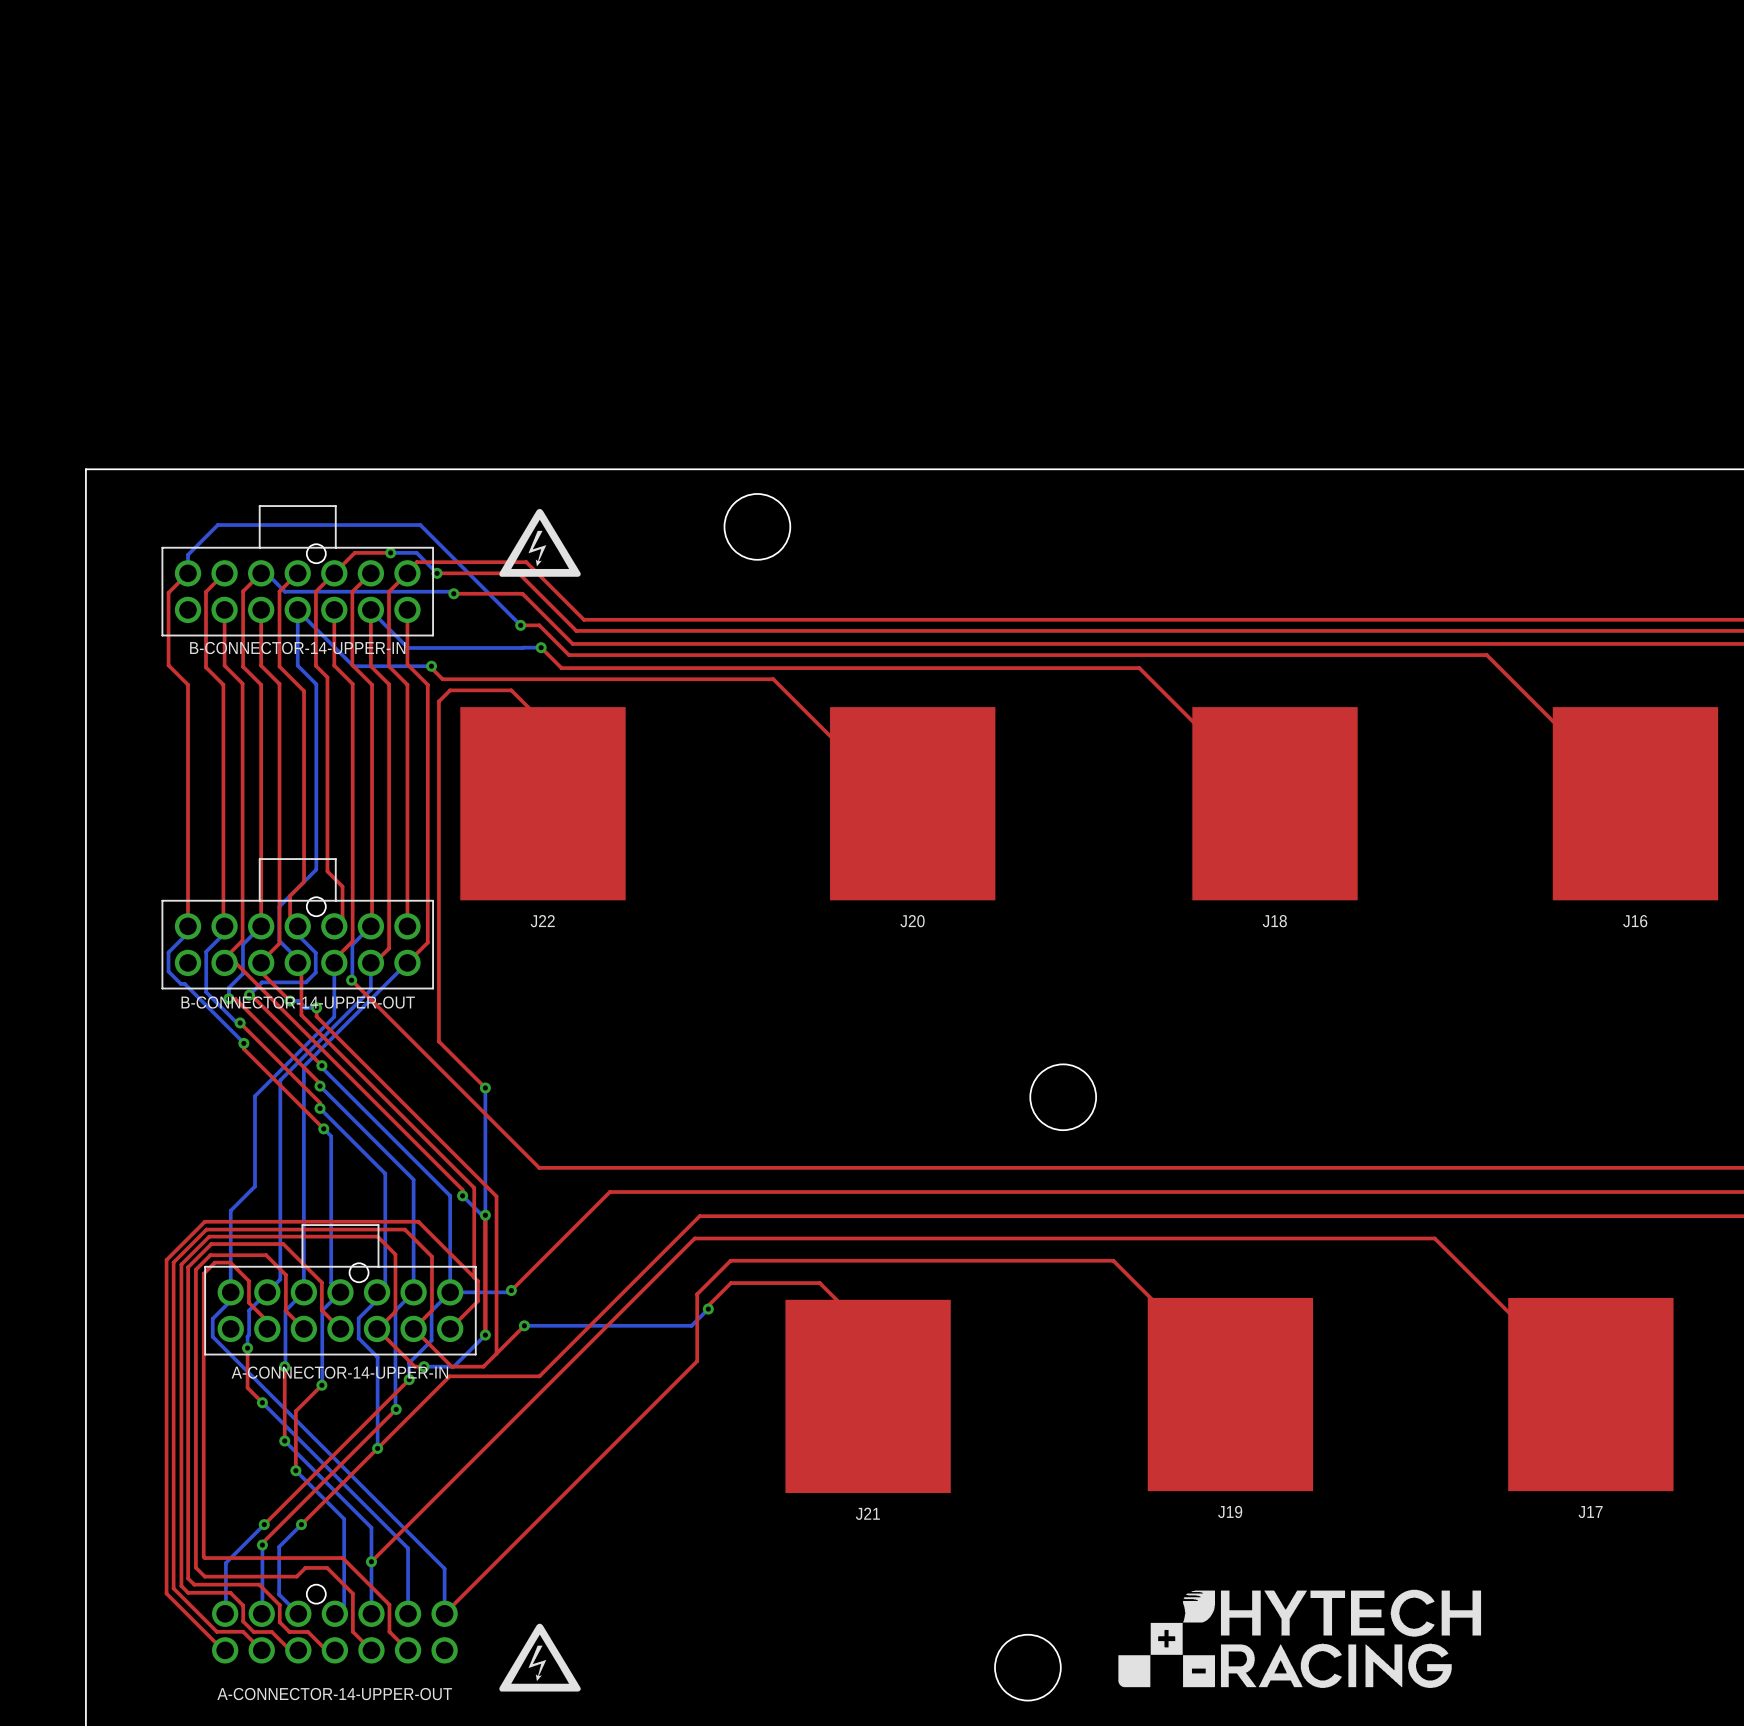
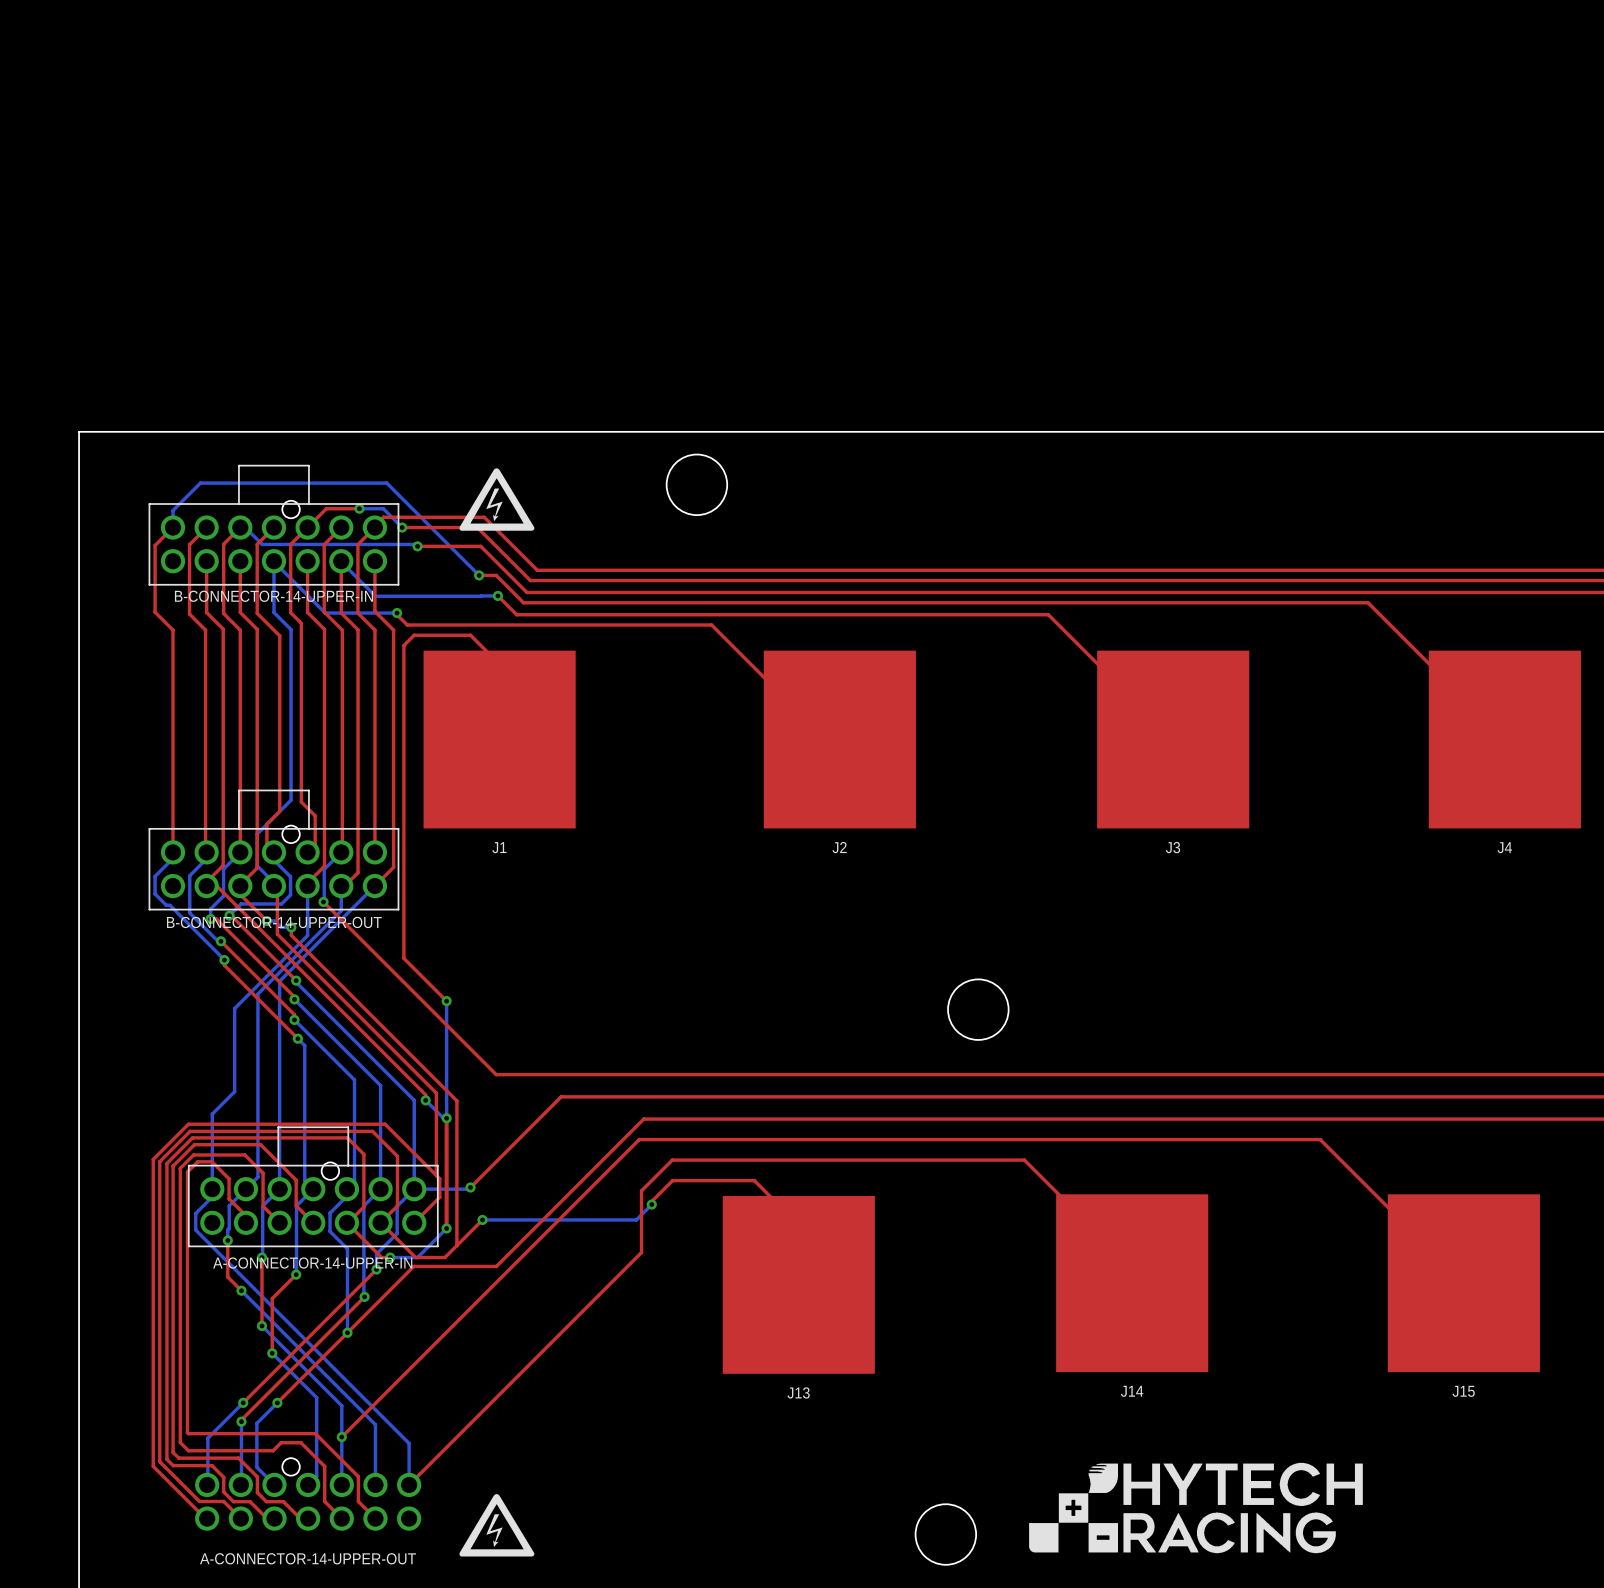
J22 name: J22 (542, 921) -> J1 (499, 847)
J20 name: J20 (912, 921) -> J2 (839, 847)
J18 name: J18 (1274, 921) -> J3 (1173, 847)
J16 name: J16 (1635, 921) -> J4 (1504, 847)
J19 name: J19 (1230, 1511) -> J14 (1132, 1391)
J17 name: J17 (1590, 1512) -> J15 (1463, 1391)
J21 name: J21 (867, 1513) -> J13 (798, 1392)

